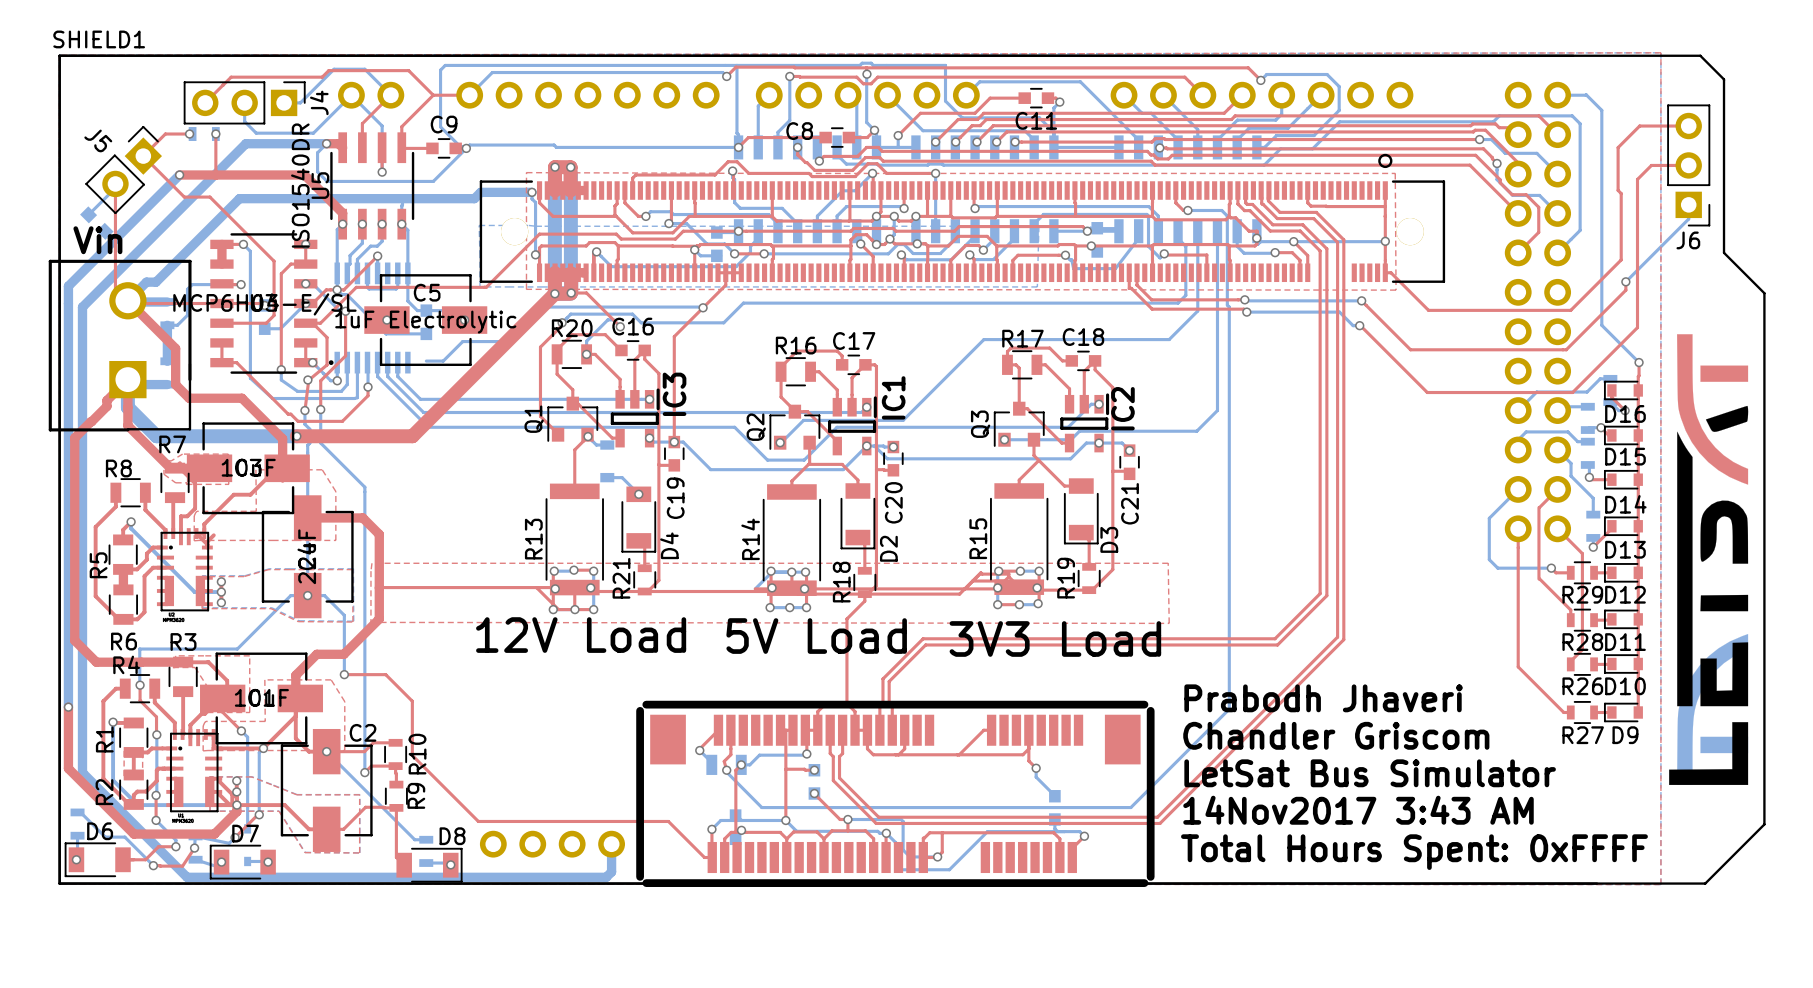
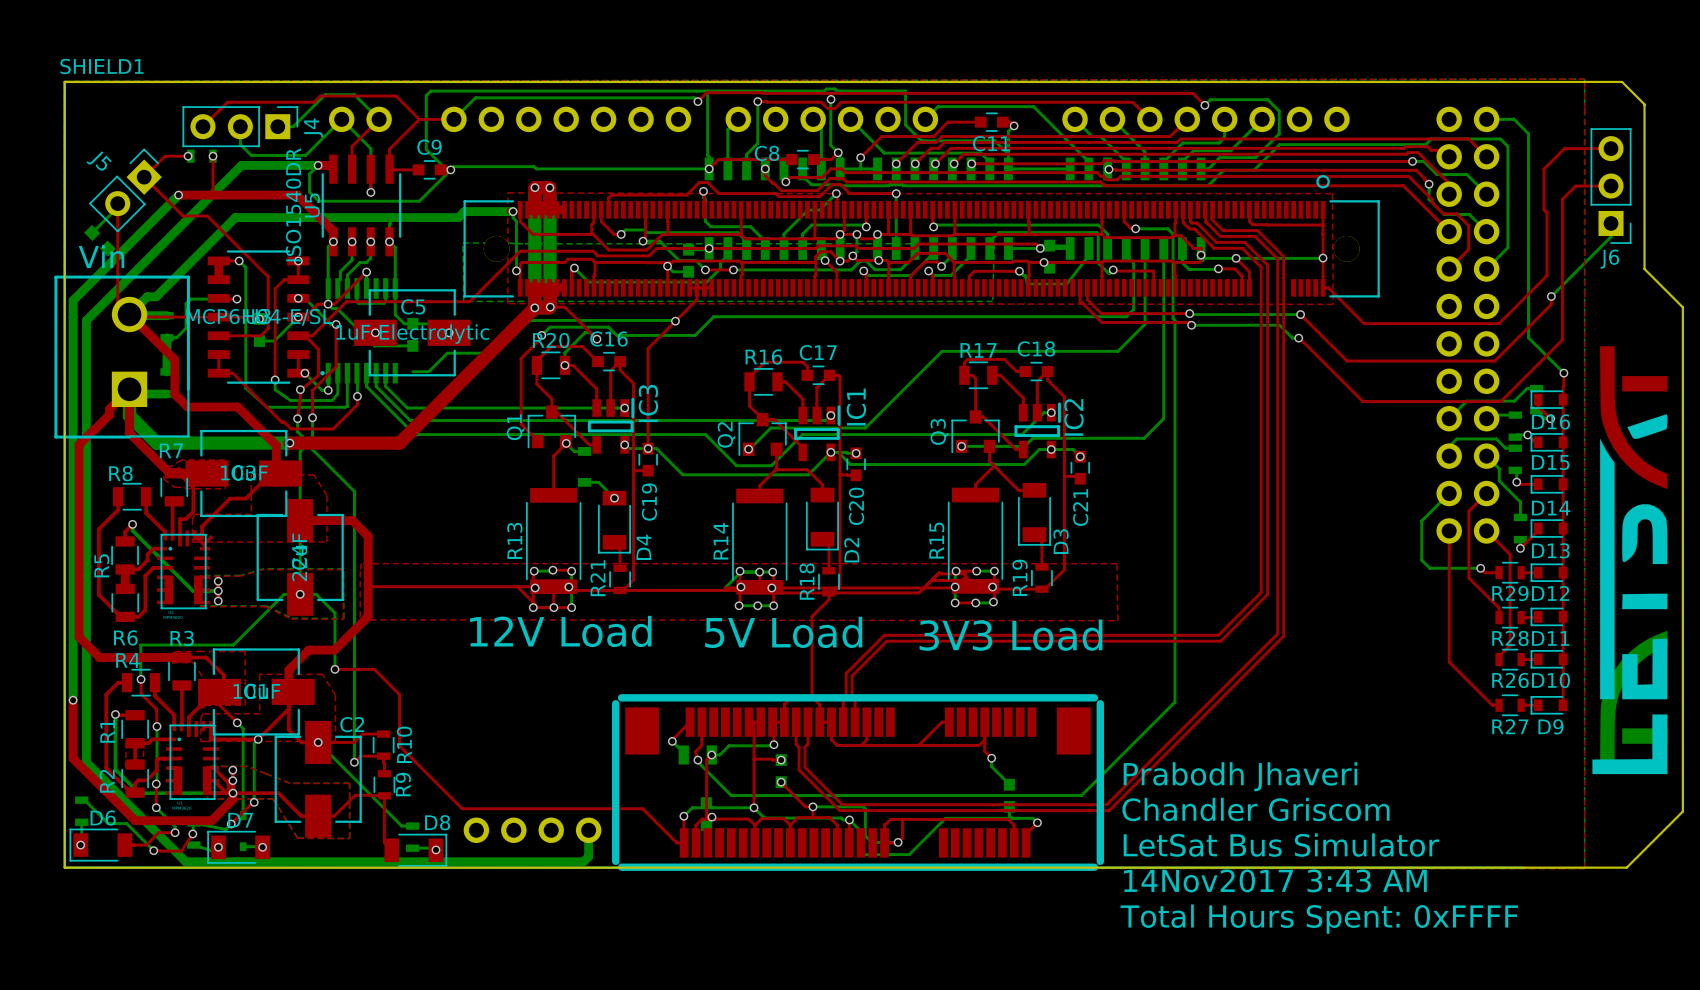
text position: Prabodh Jhaveri (1323, 698) -> Prabodh Jhaveri (1240, 776)
text position: Chandler Griscom (1336, 735) -> Chandler Griscom (1255, 809)
text position: LetSat Bus Simulator (1370, 773) -> LetSat Bus Simulator (1281, 845)
text position: 14Nov2017 3:43 AM (1358, 810) -> 14Nov2017 3:43 AM (1275, 880)
text position: Total Hours Spent: 0xFFFF (1414, 852) -> Total Hours Spent: 0xFFFF (1319, 919)

